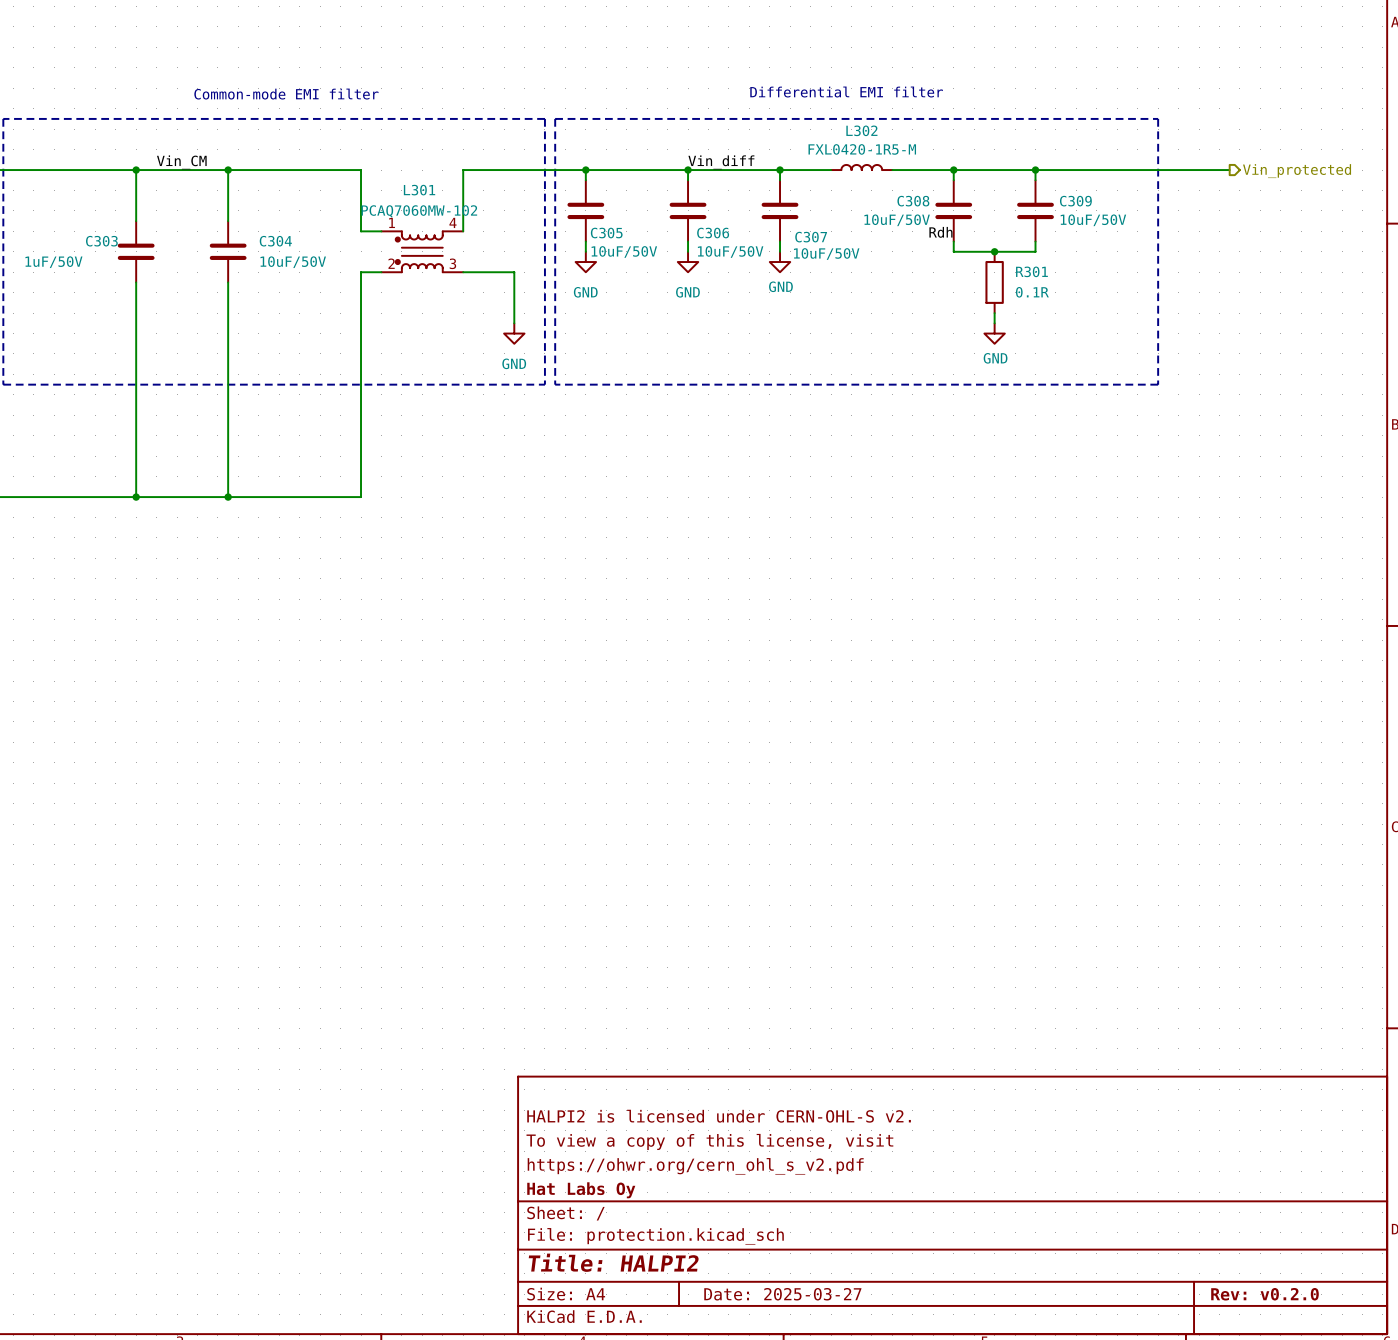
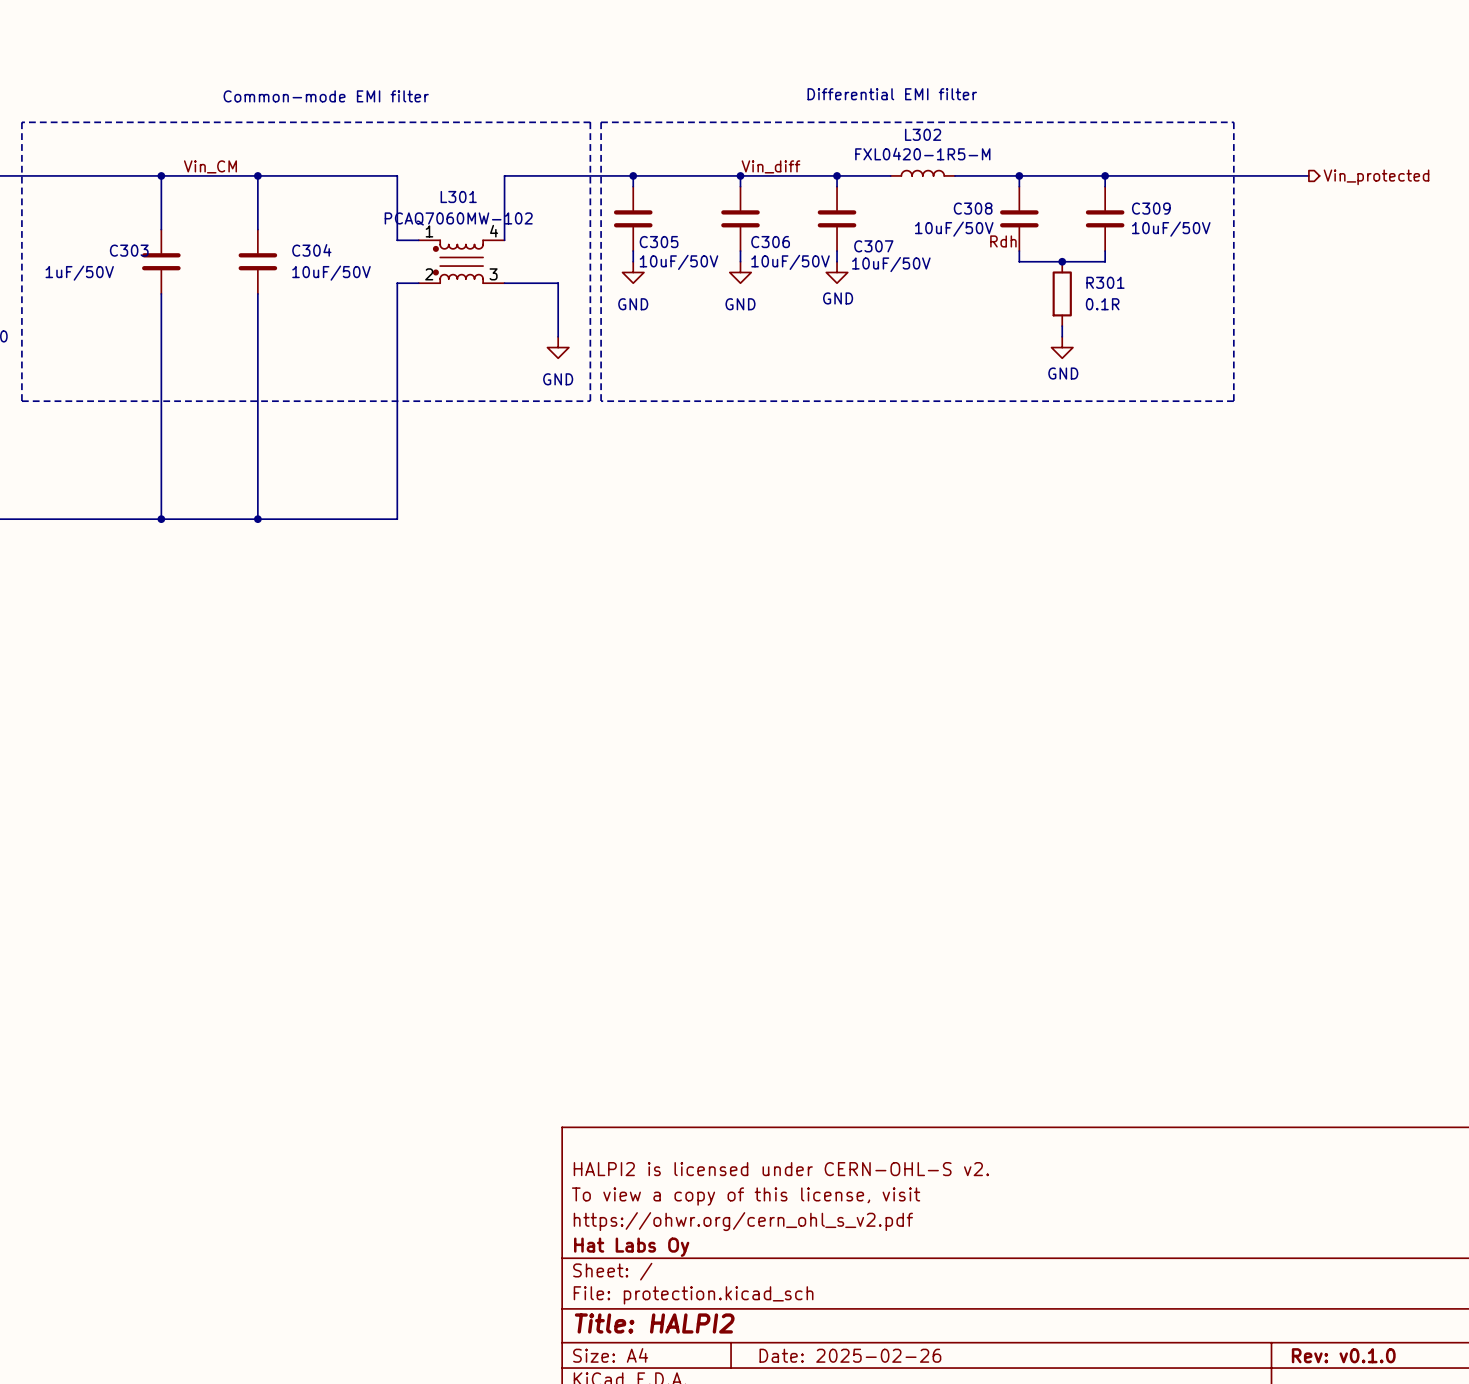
title block: Date: 2025-03-27 (782, 1294) -> Date: 2025-02-26 (850, 1355)
title block: Rev: v0.2.0 (1264, 1294) -> Rev: v0.1.0 (1343, 1355)

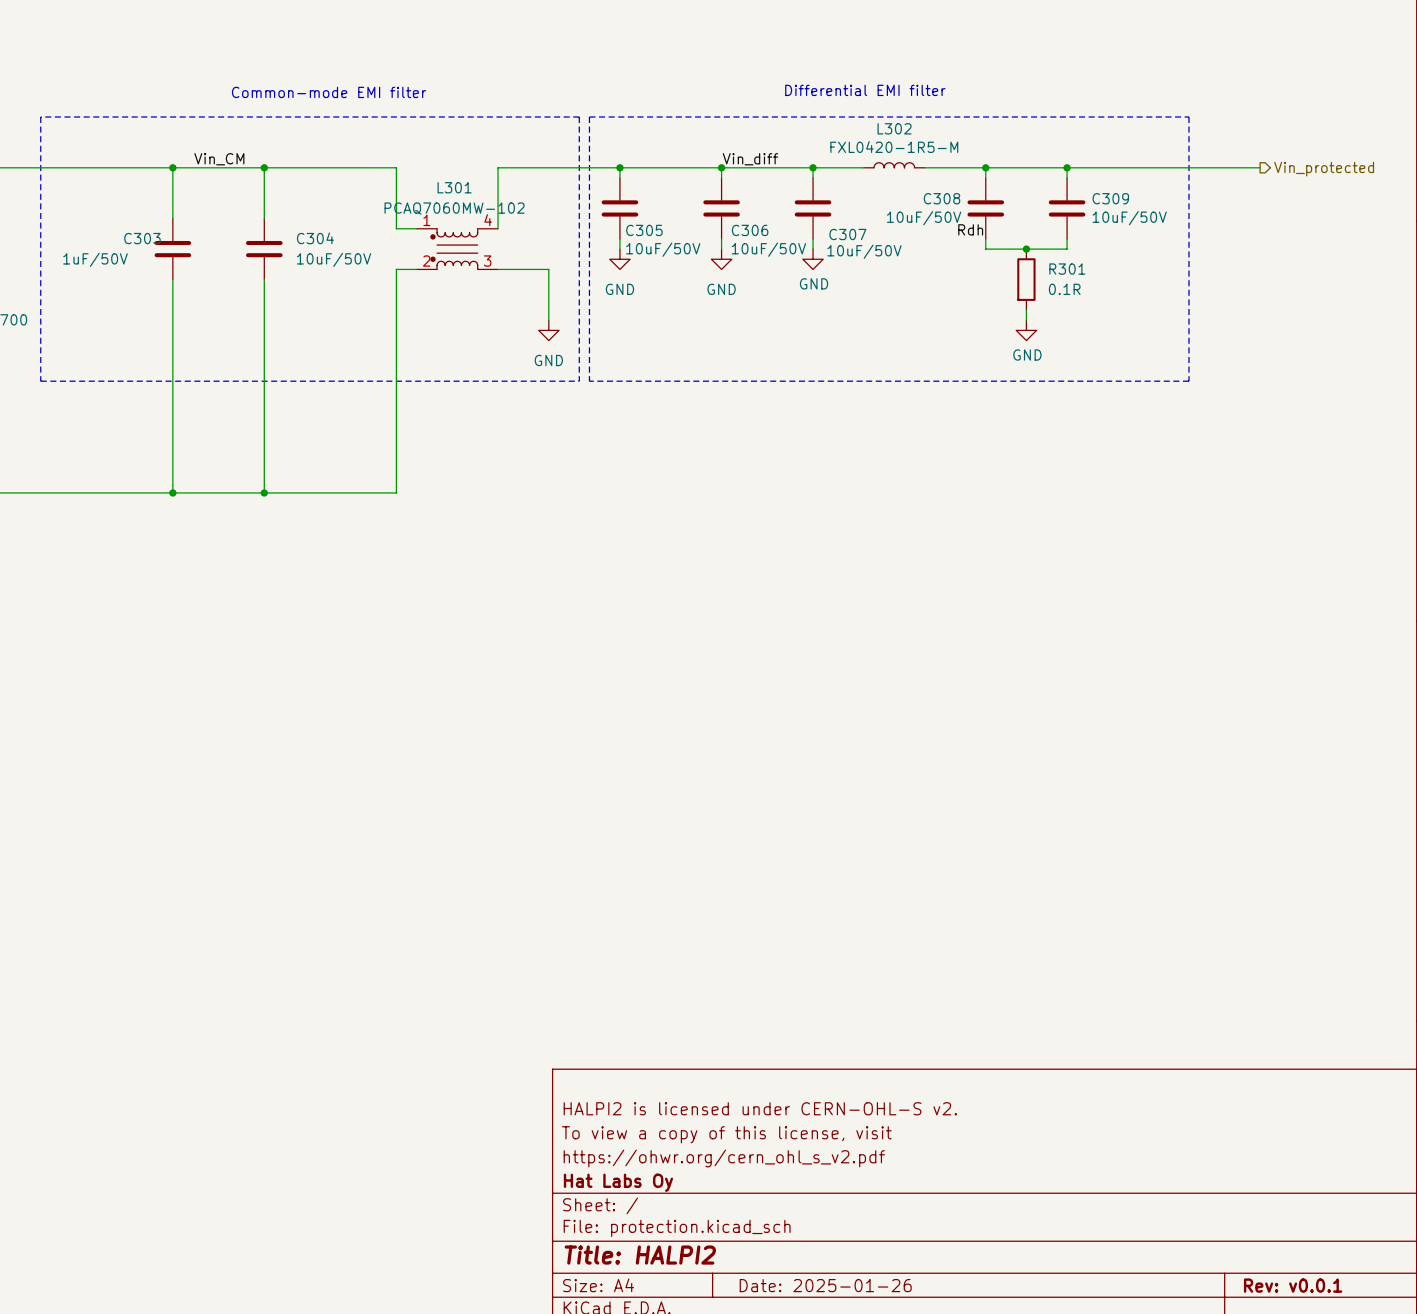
title block: Date: 2025-02-26 (850, 1355) -> Date: 2025-01-26 (825, 1285)
title block: Rev: v0.1.0 (1343, 1355) -> Rev: v0.0.1 (1293, 1285)

